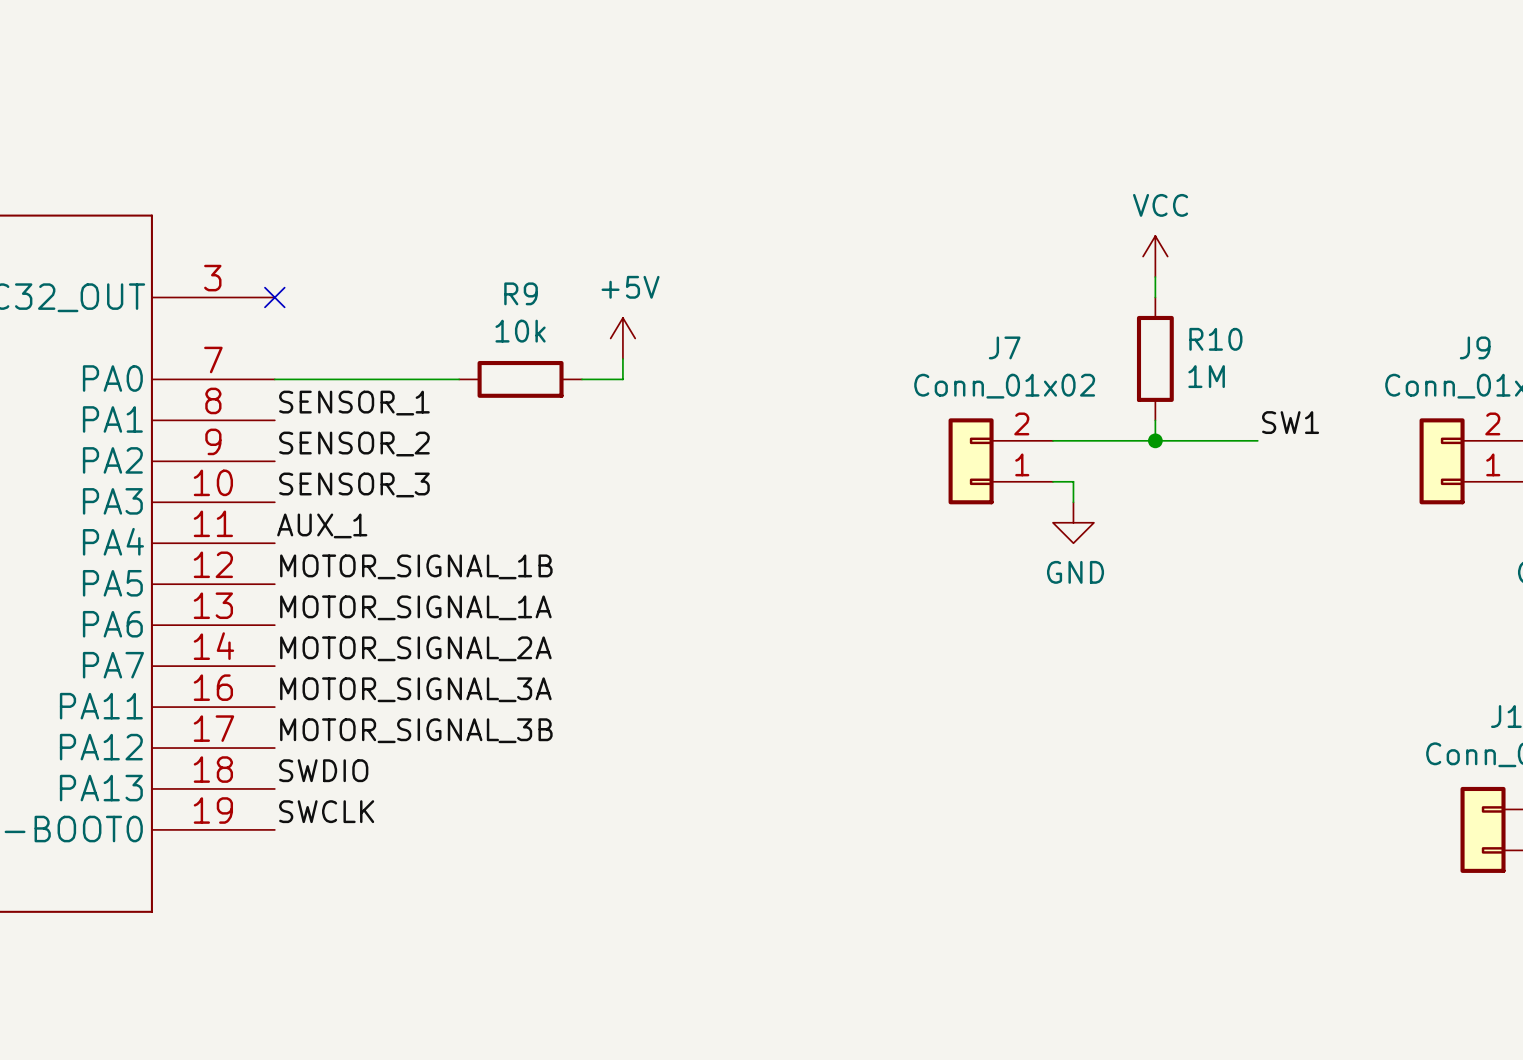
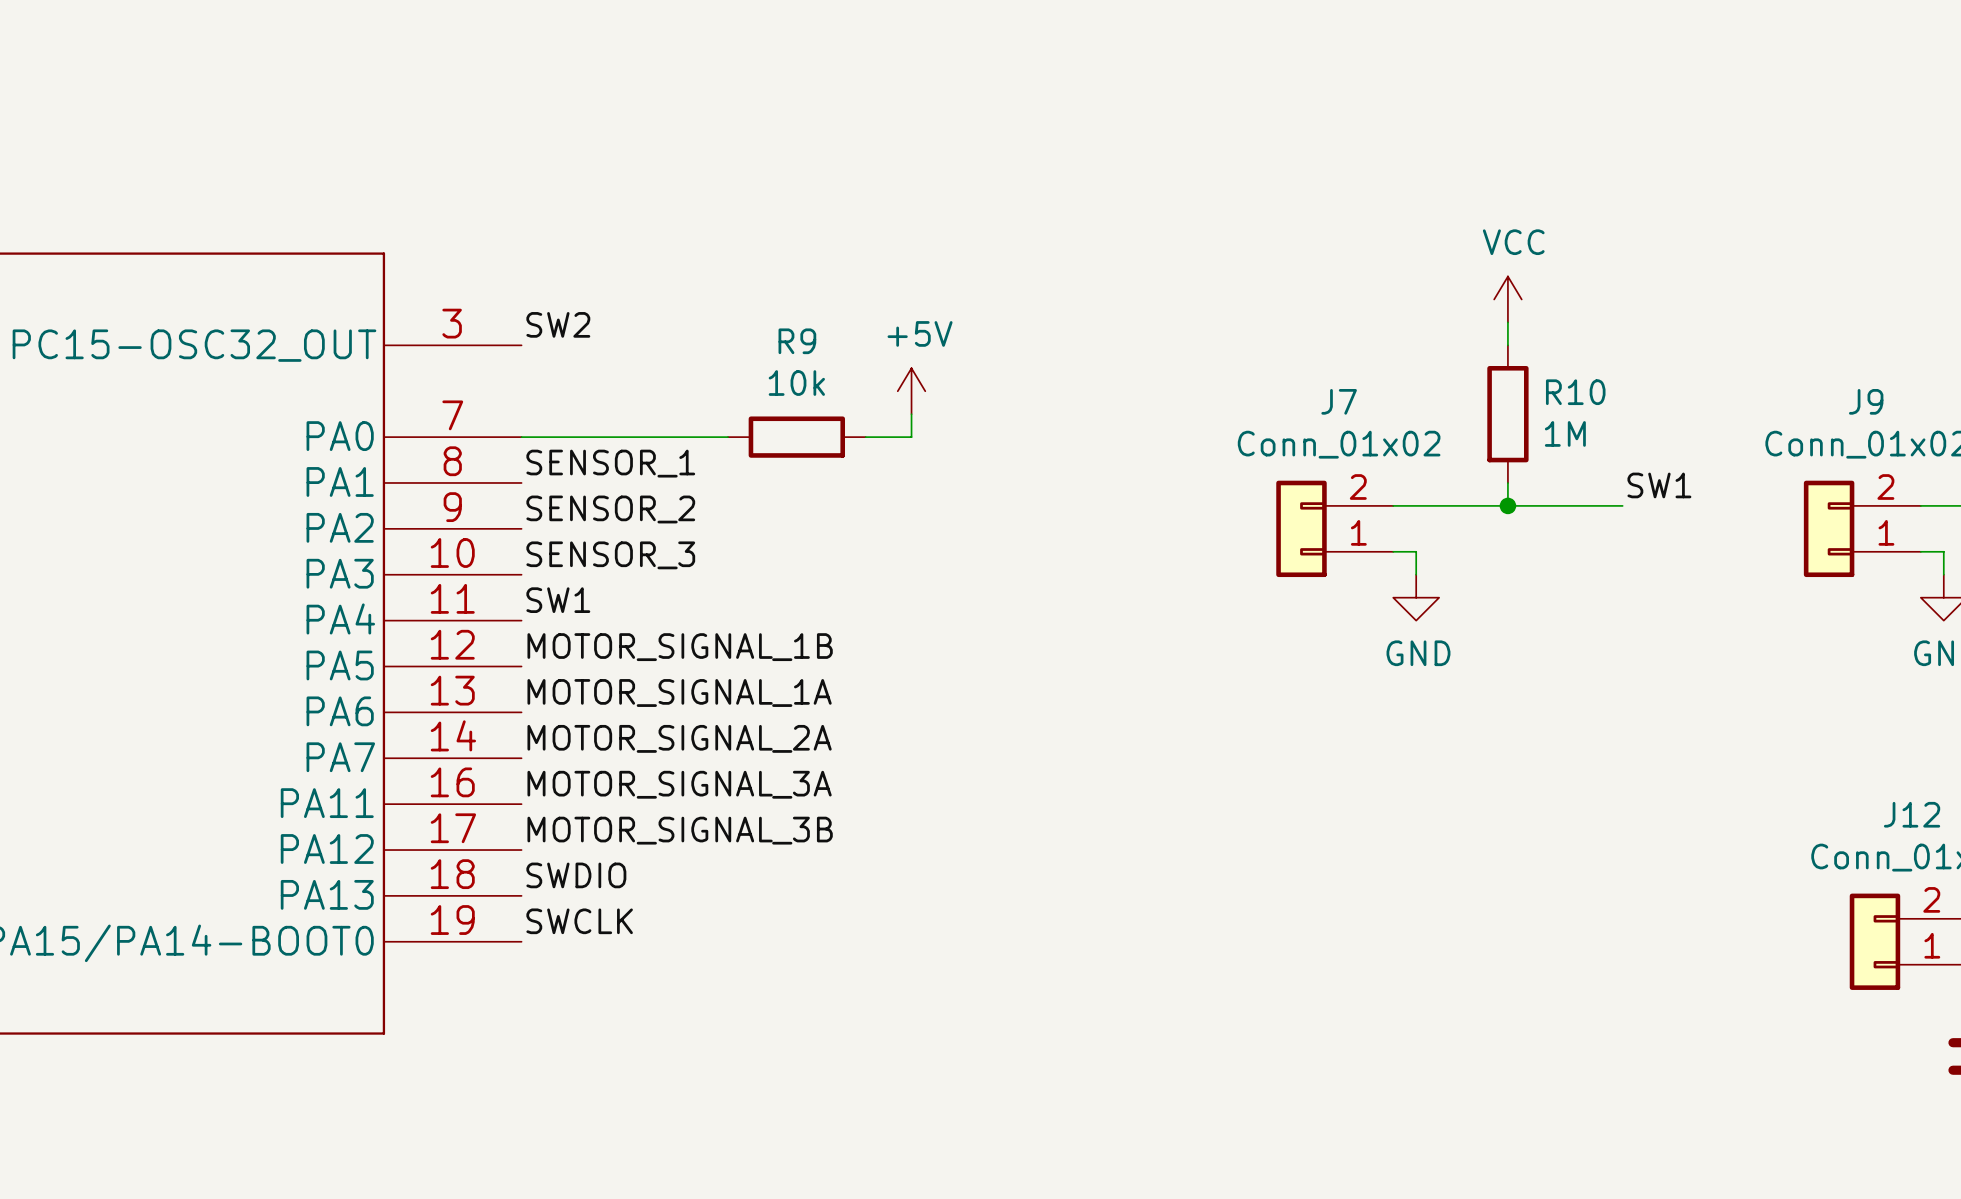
label: none -> SW2 (558, 324)
no-connect mark: (274, 297) -> none
label: AUX_1 (322, 525) -> SW1 (558, 600)

